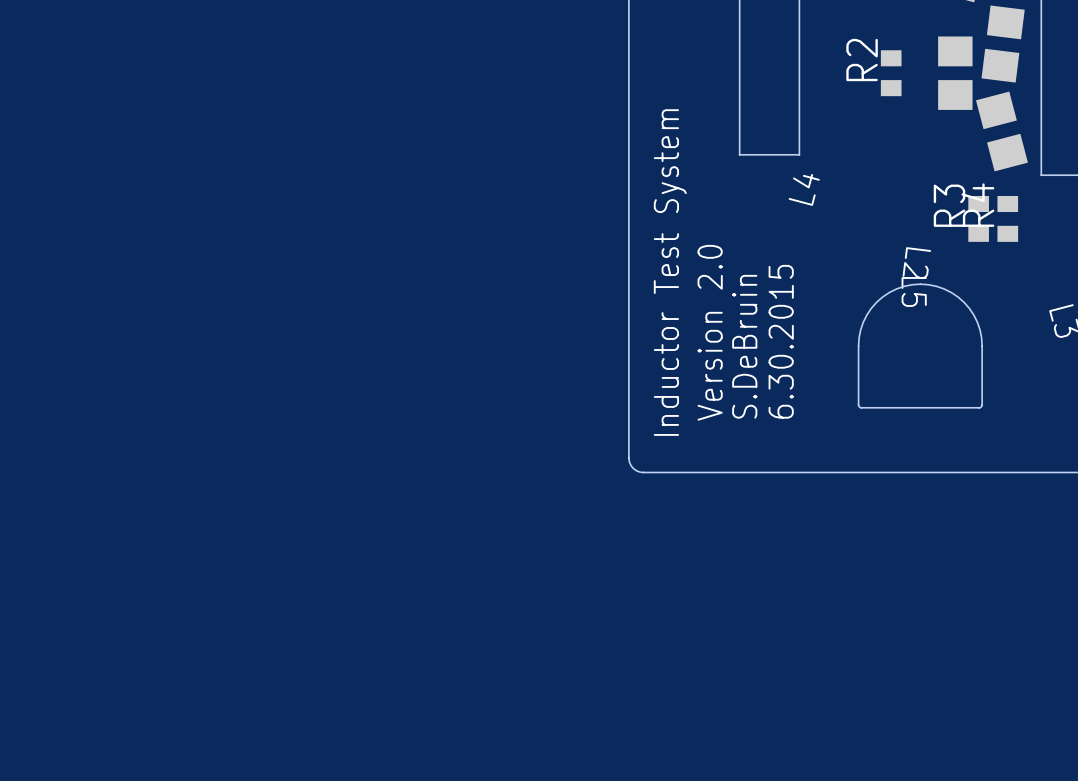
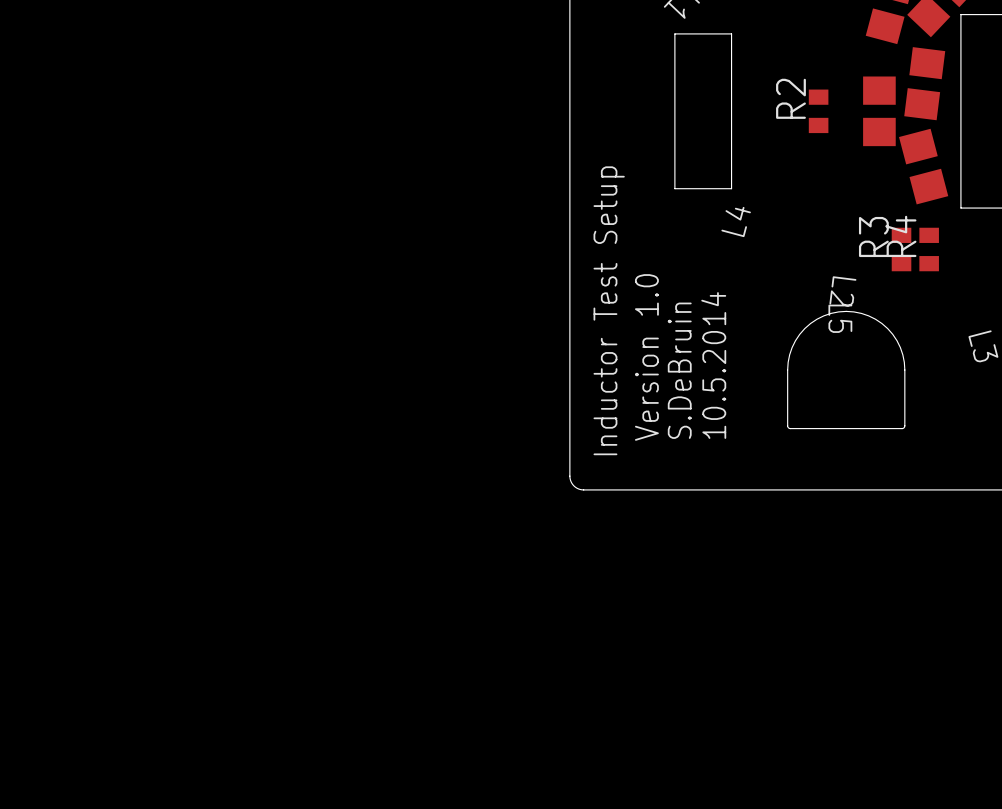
text: Inductor Test System (670, 272) -> Inductor Test Setup (609, 310)
text: Version 2.0 (710, 332) -> Version 1.0 (646, 357)
text: 6.30.2015 (781, 341) -> 10.5.2014 (713, 365)

